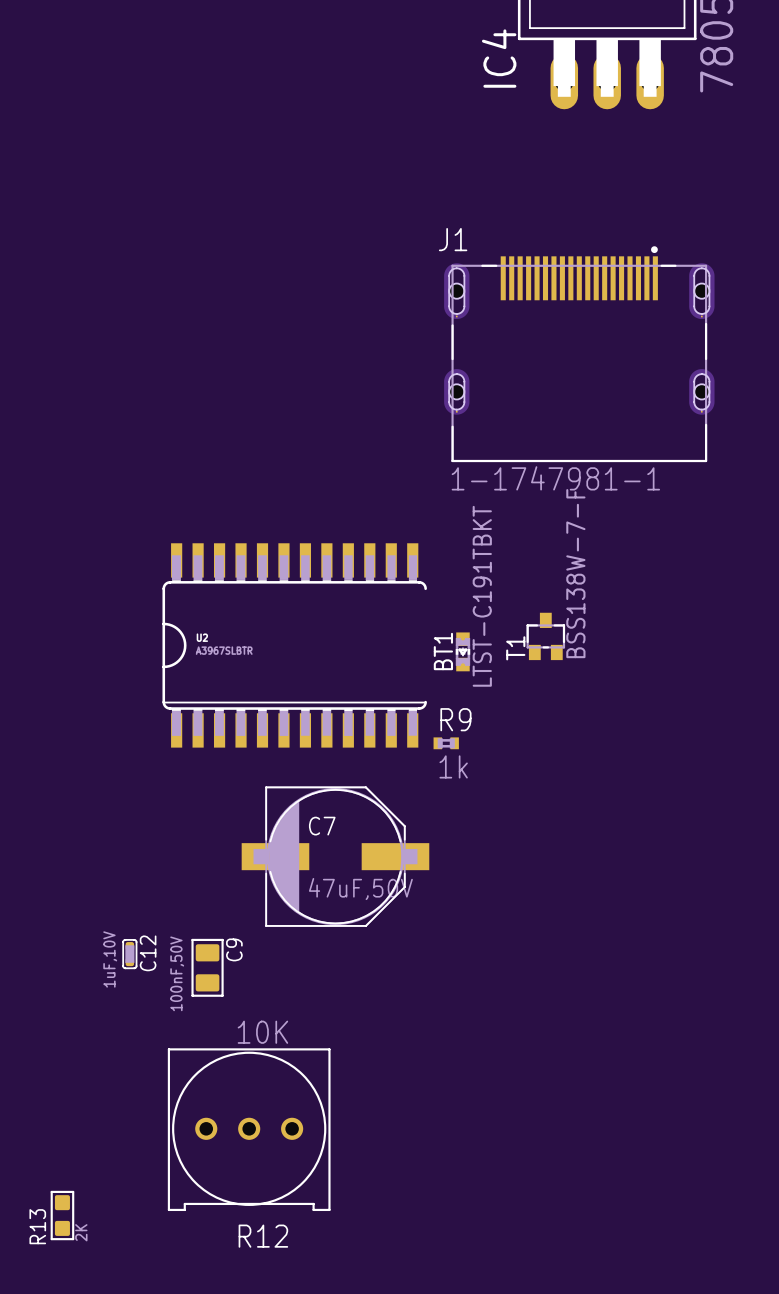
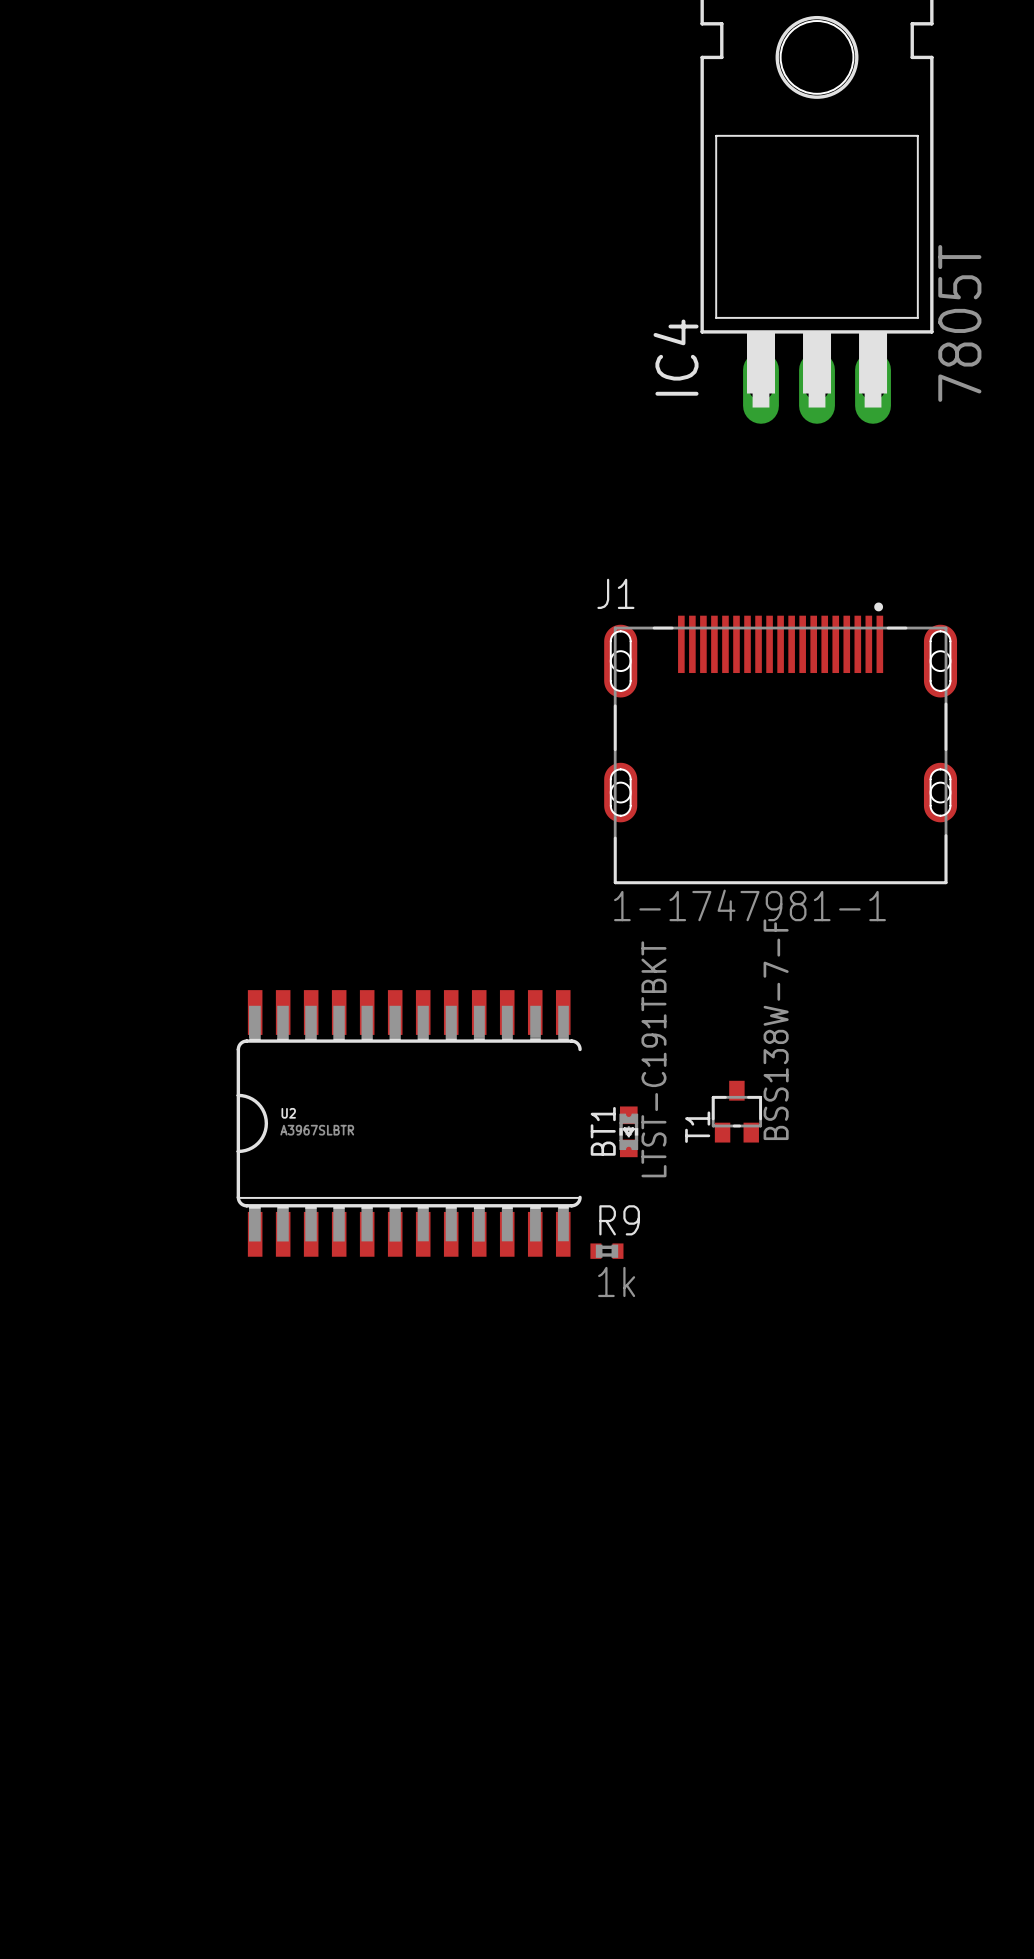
C7: 47uF,50V (335, 856) -> none
C12: 1uF,10V (129, 954) -> none
C9: 100nF,50V (207, 967) -> none
R12: 10K (249, 1129) -> none
R13: 2K (62, 1215) -> none

